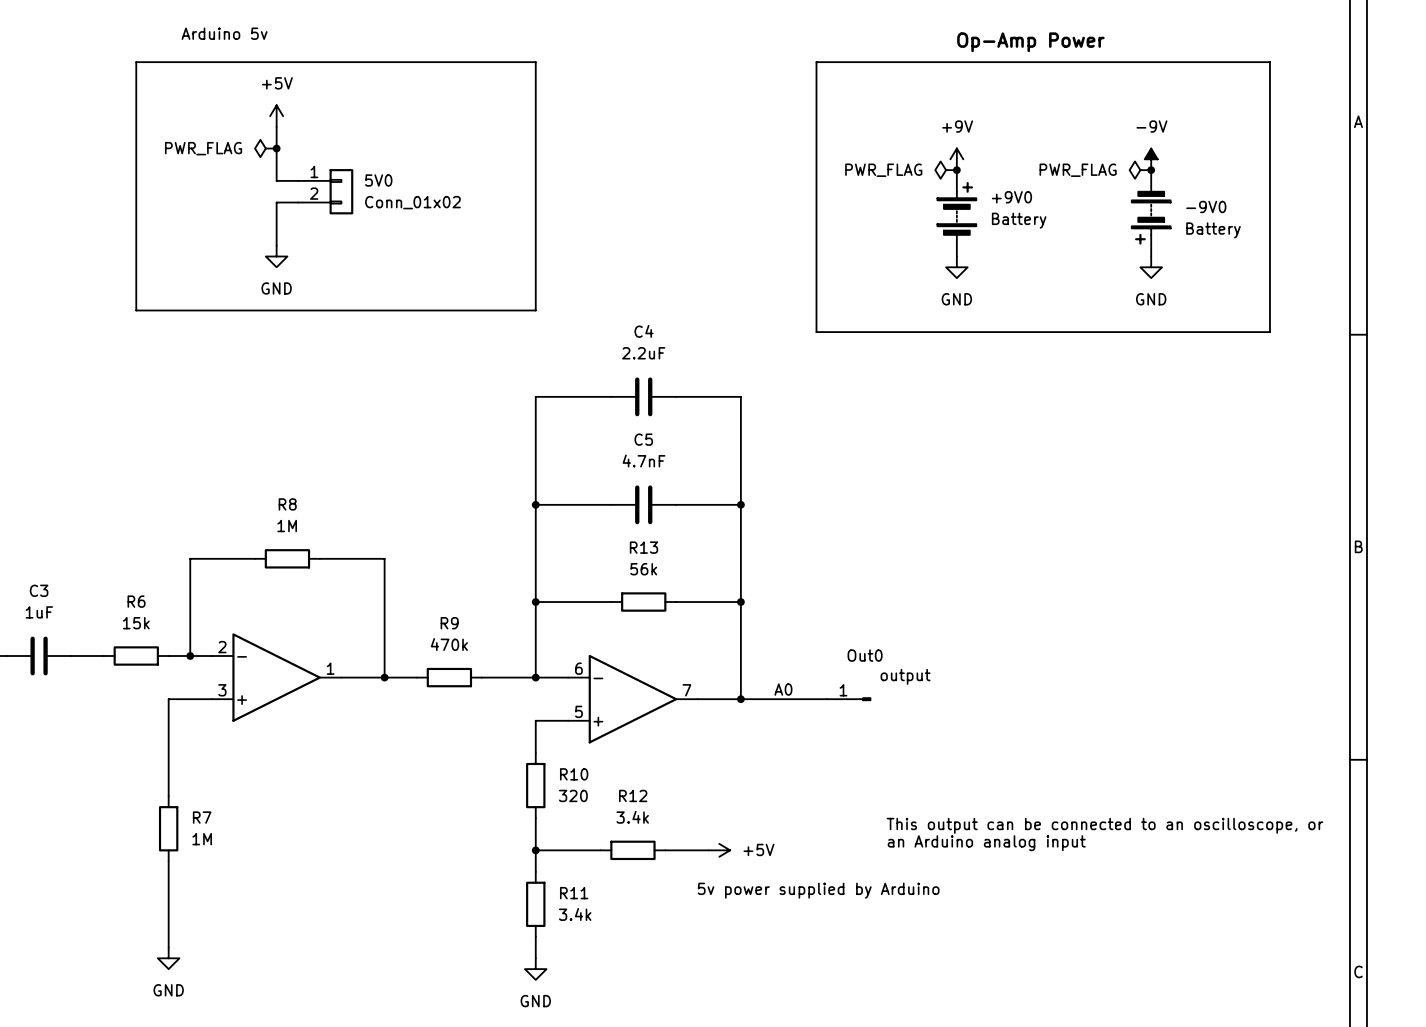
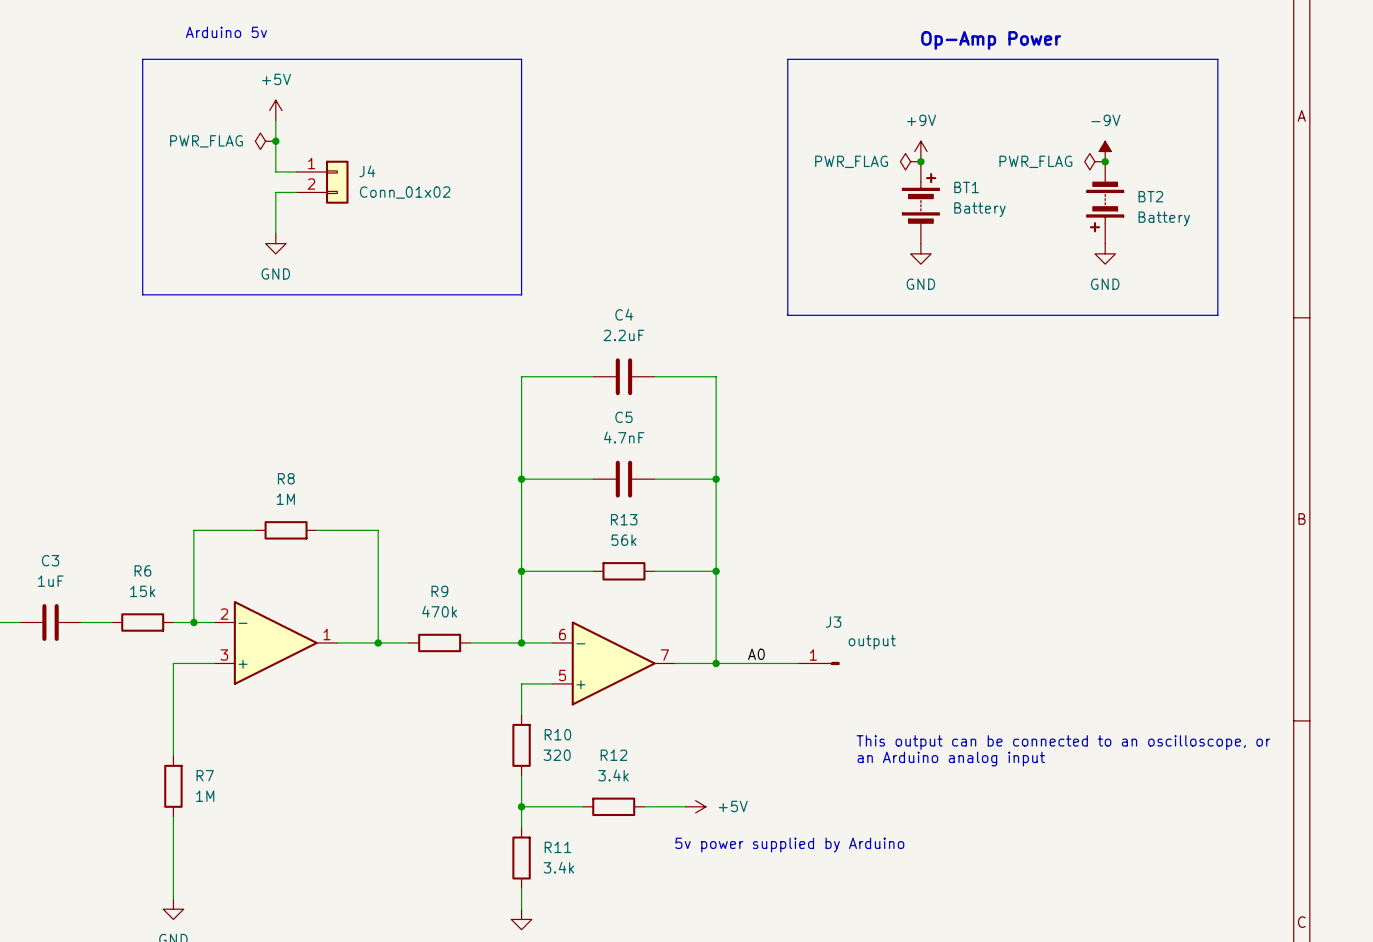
5V0 name: 5V0 (378, 180) -> J4 (367, 171)
+9V0 name: +9V0 (1011, 197) -> BT1 (966, 187)
-9V0 name: -9V0 (1206, 206) -> BT2 (1150, 196)
Out0 name: Out0 (865, 655) -> J3 (833, 622)
text position: This output can be connected to an oscilloscope, or (1104, 825) -> This output can be connected to an oscilloscope, or (1063, 742)
text position: an Arduino analog input (986, 843) -> an Arduino analog input (951, 759)

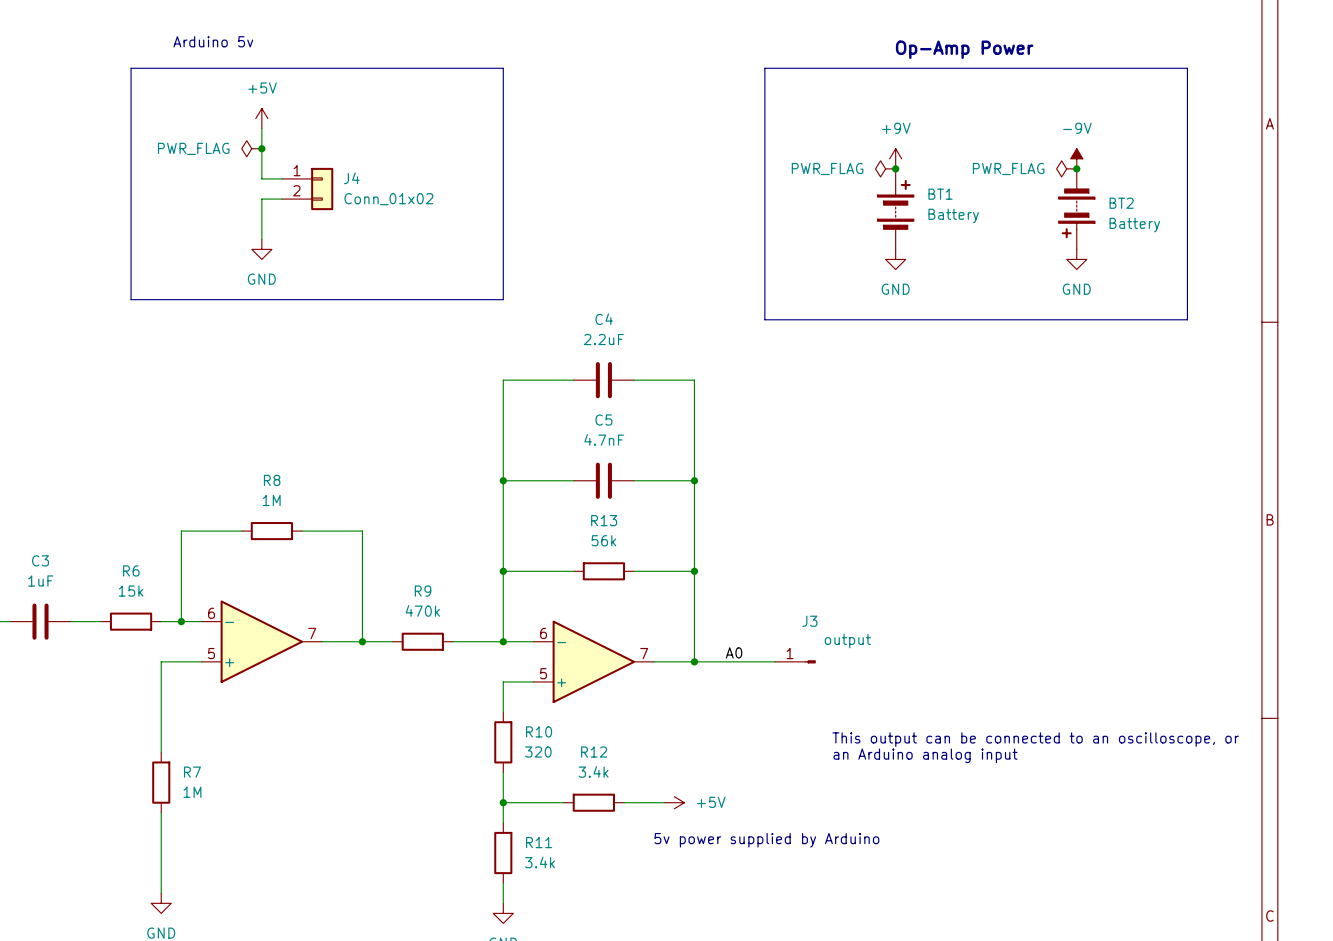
part pin number: 2 (224, 614) -> 6 (211, 613)
part pin number: 1 (327, 634) -> 7 (312, 633)
part pin number: 3 (224, 655) -> 5 (211, 653)

